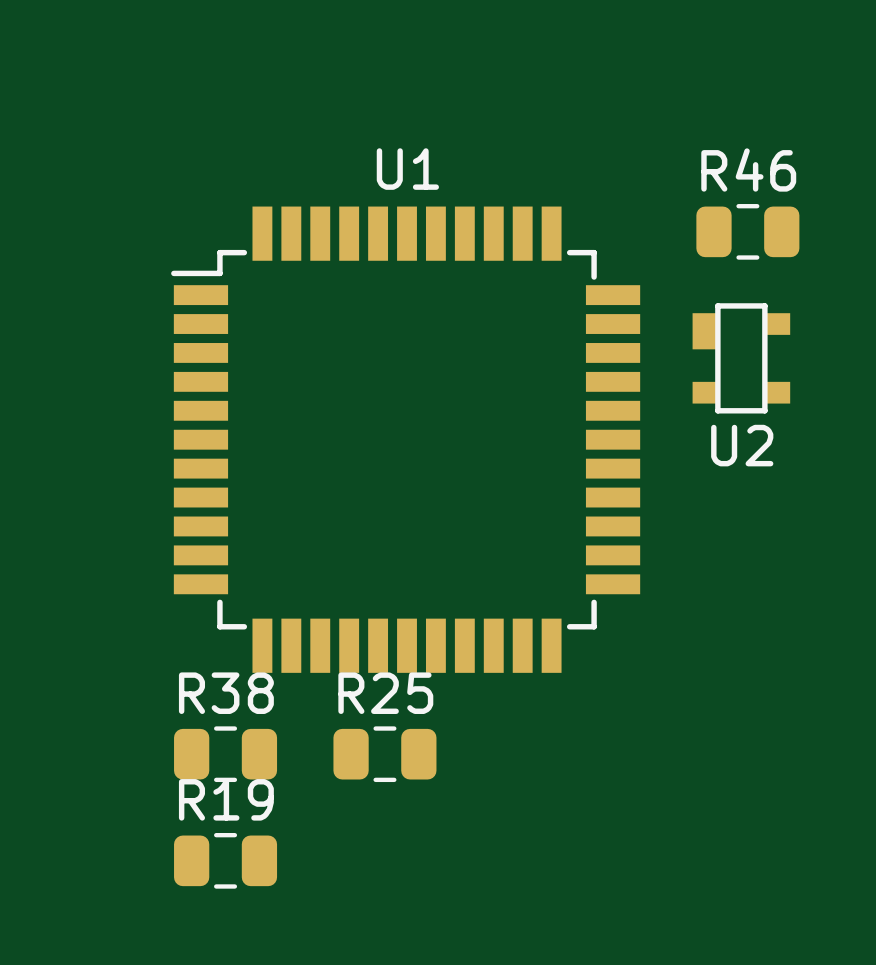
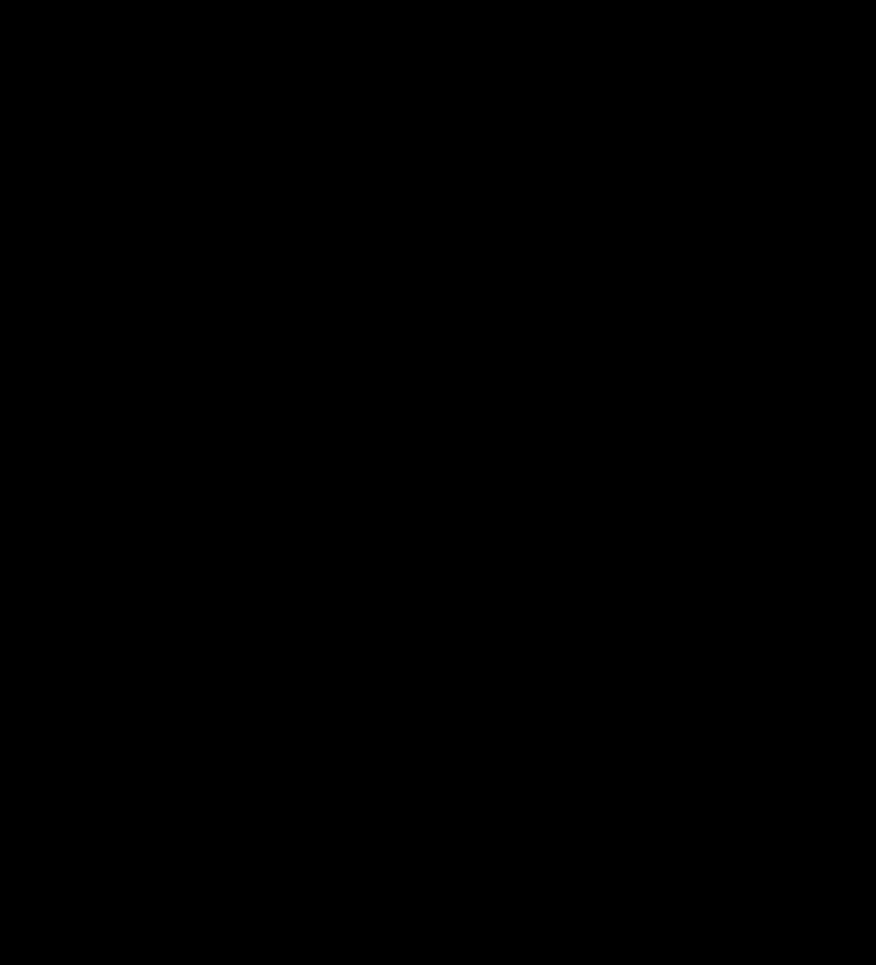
R46: (747, 231) -> none
U2: (741, 358) -> none
U1: (405, 439) -> none
R38: (225, 754) -> none
R25: (384, 754) -> none
R19: (225, 860) -> none

